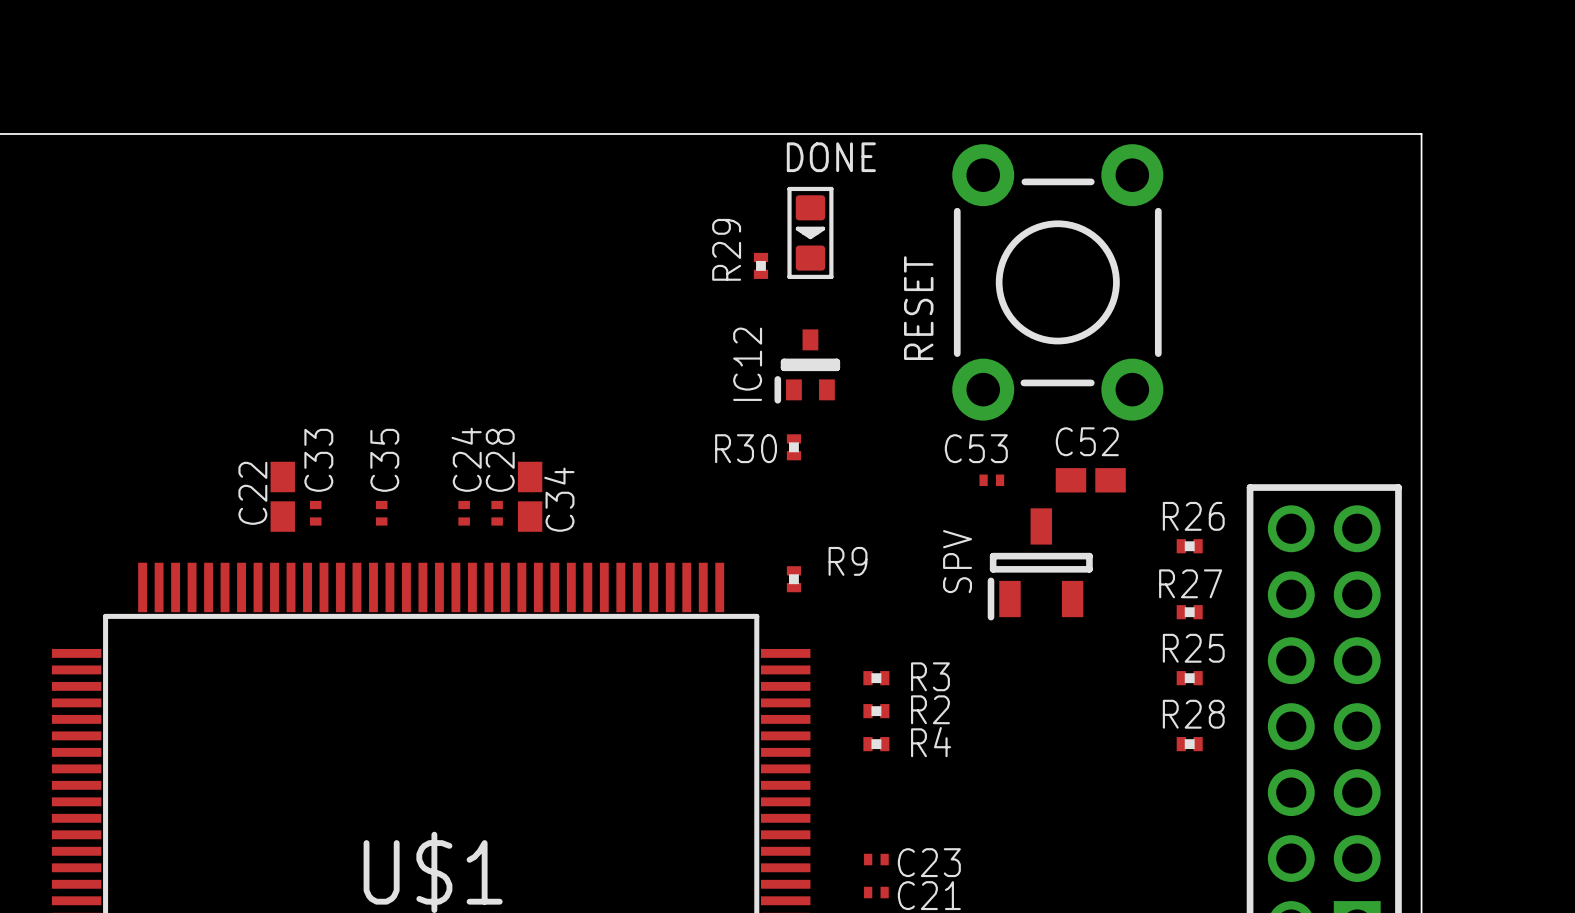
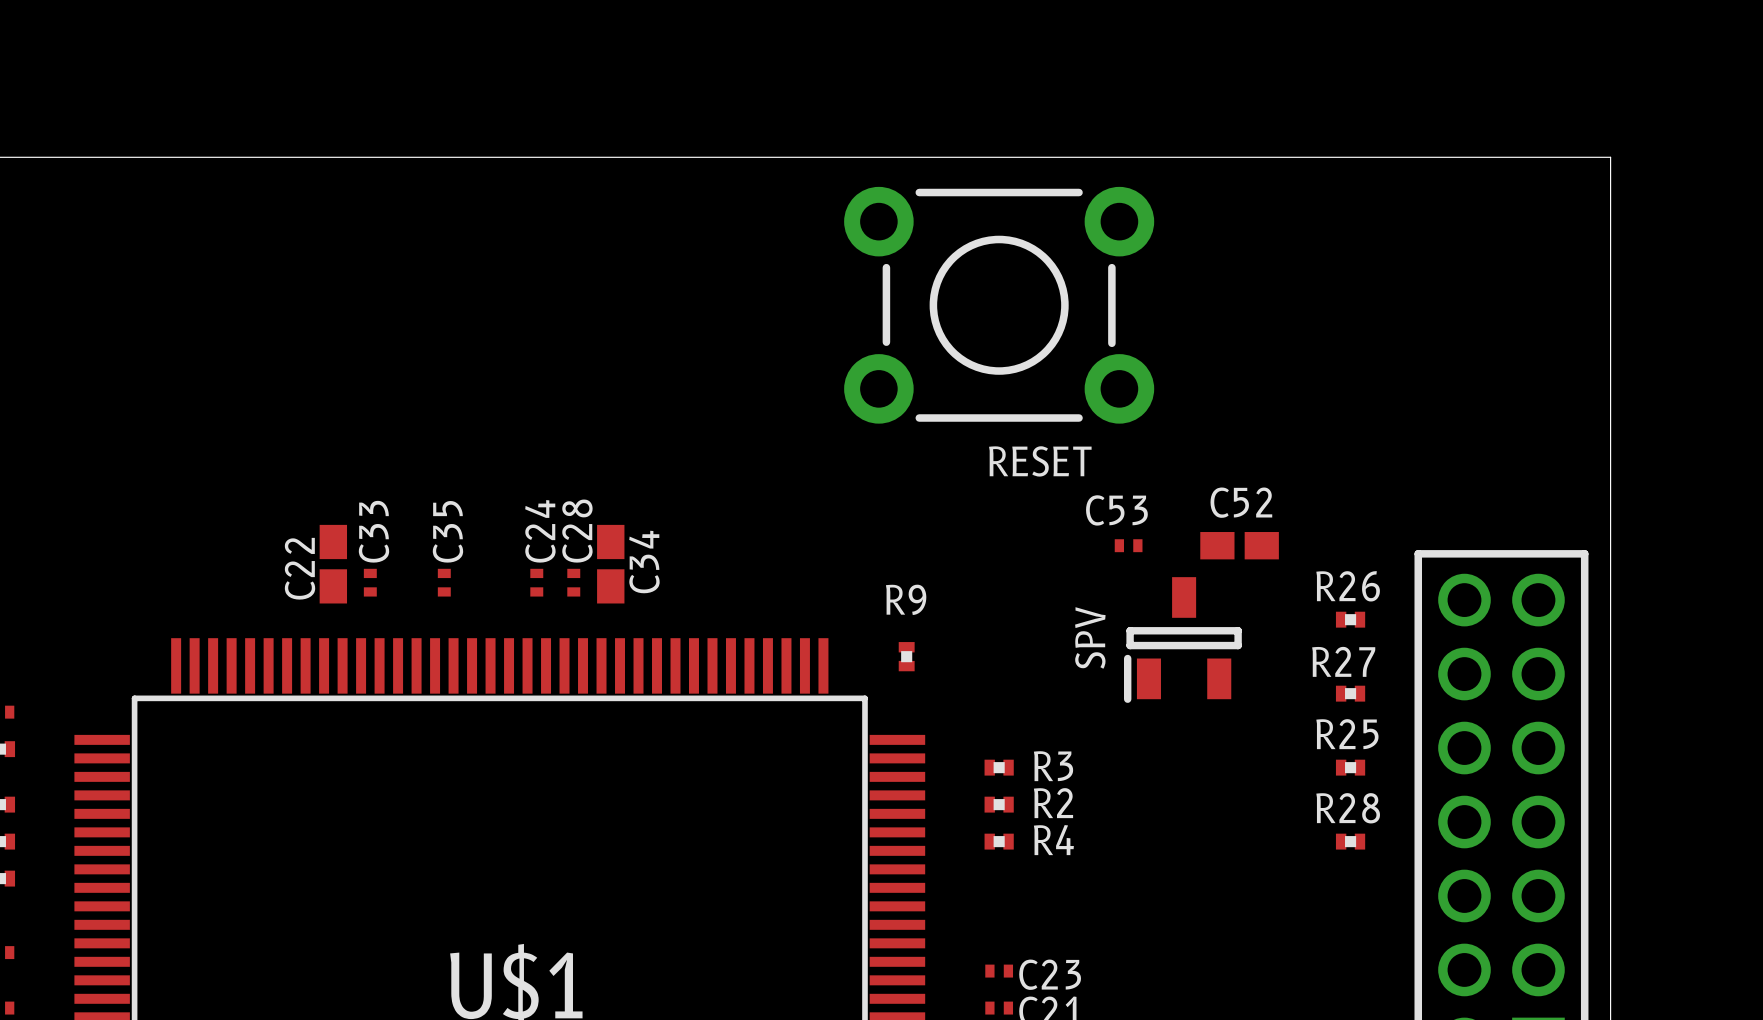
DONE: (810, 232) -> none
R29: (760, 265) -> none
RESET rotation: 0° (1057, 282) -> 90° clockwise (999, 305)
RESET position: (1057, 282) -> (999, 305)
RESET name position: RESET (918, 308) -> RESET (1040, 461)
IC12: (807, 366) -> none
R30: (793, 447) -> none
R9 name position: R9 (848, 561) -> R9 (906, 599)

